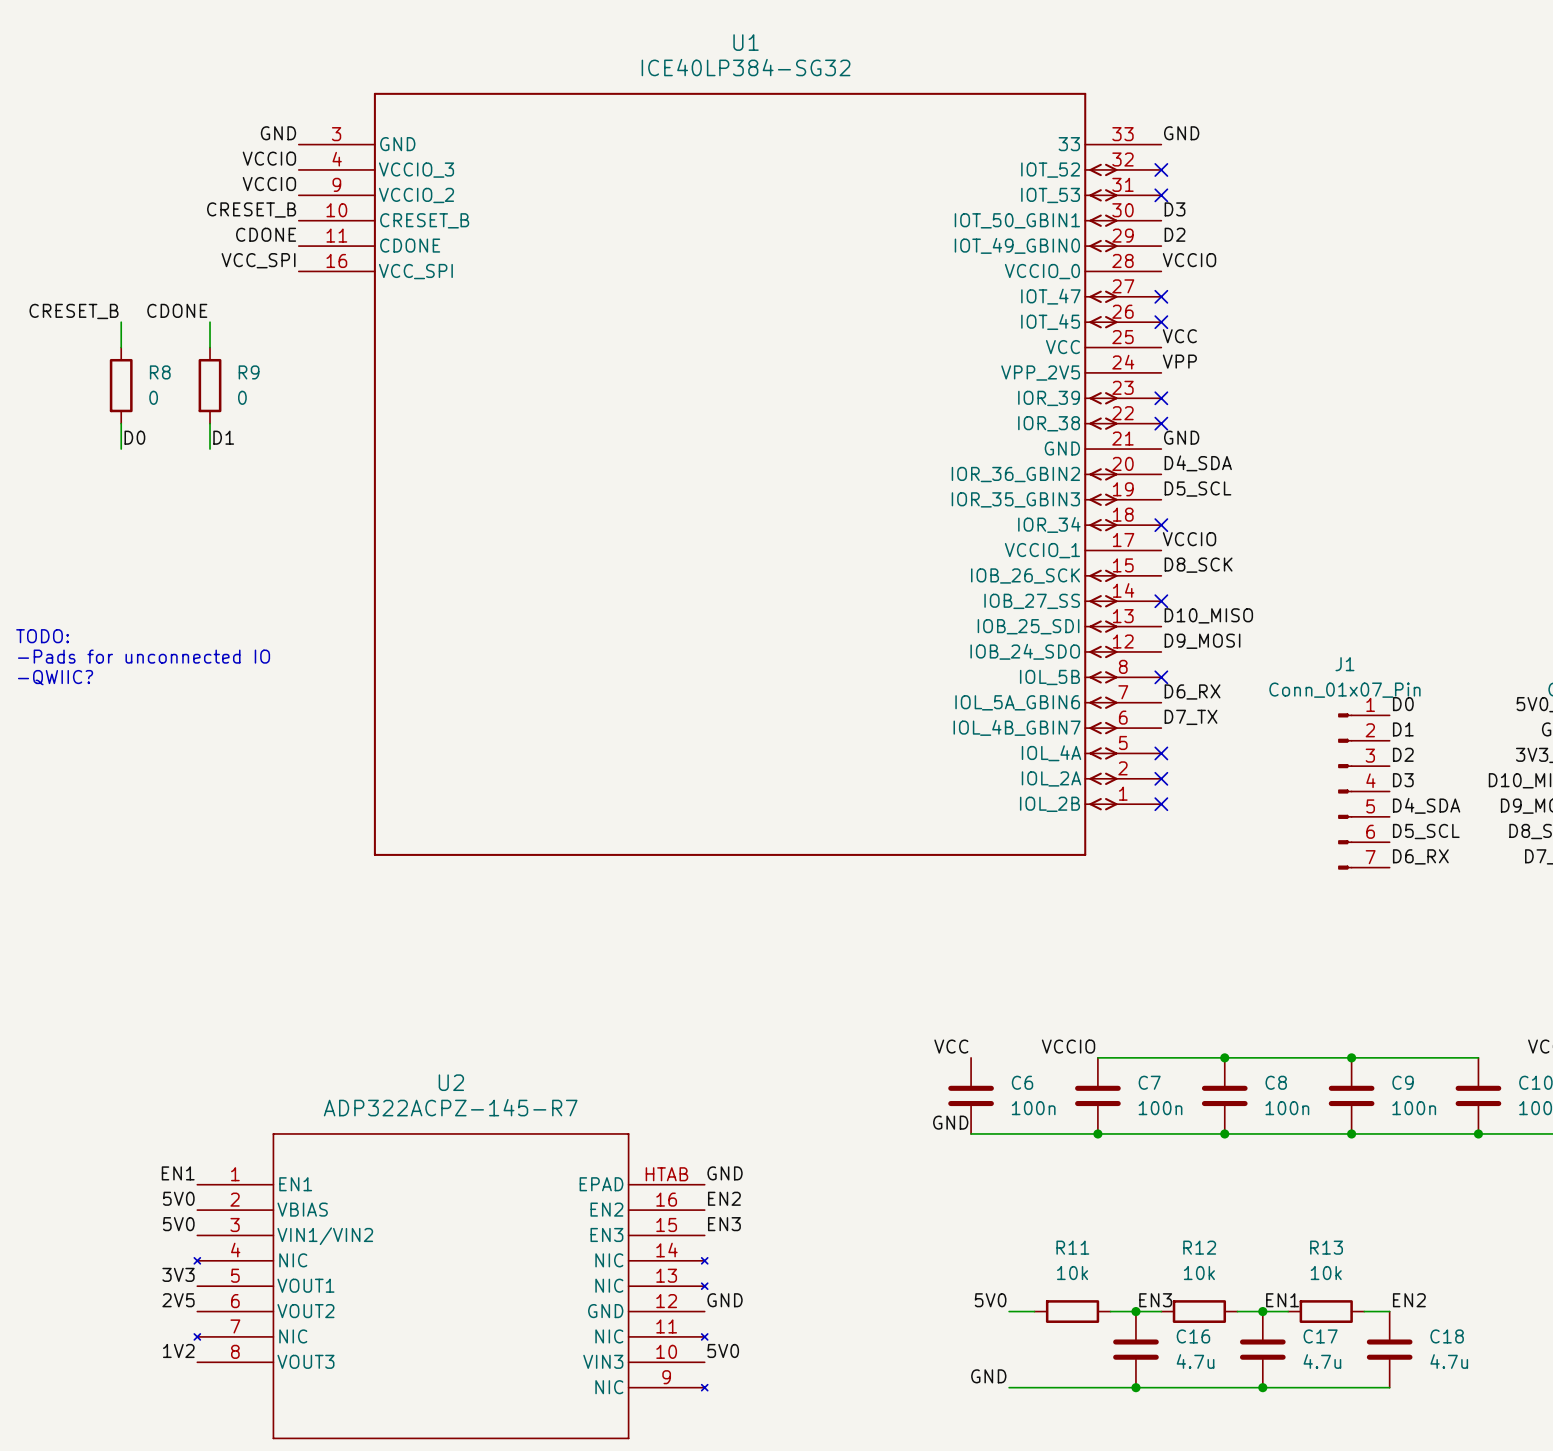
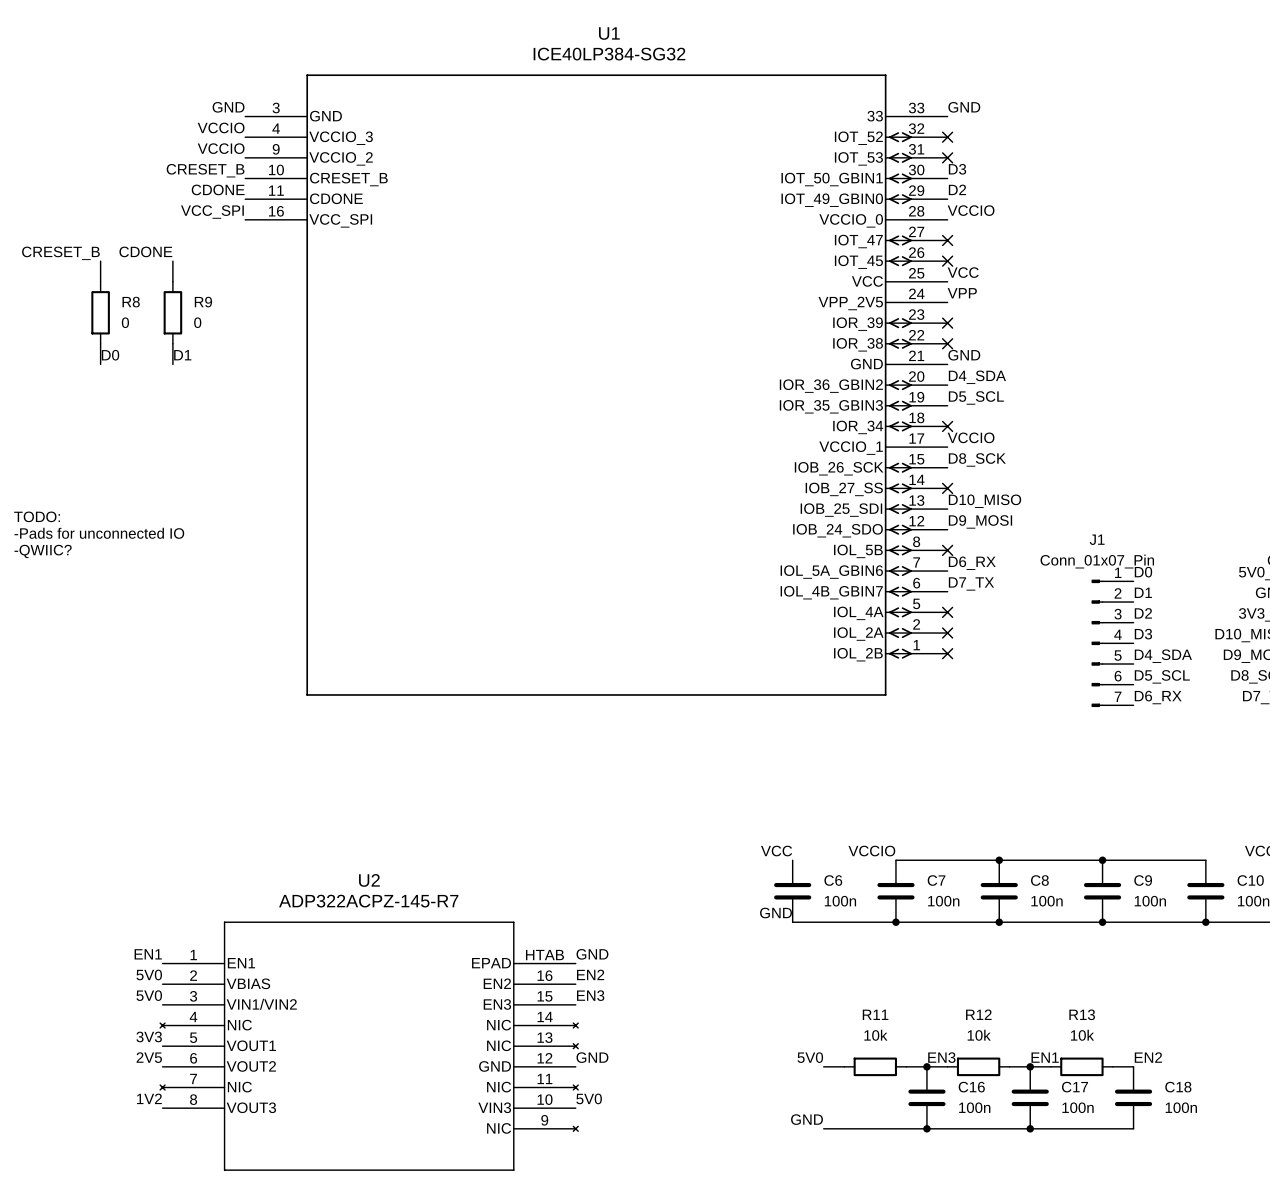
C16 value: 4.7u (1195, 1361) -> 100n (974, 1107)
C17 value: 4.7u (1322, 1361) -> 100n (1078, 1107)
C18 value: 4.7u (1449, 1361) -> 100n (1181, 1107)

